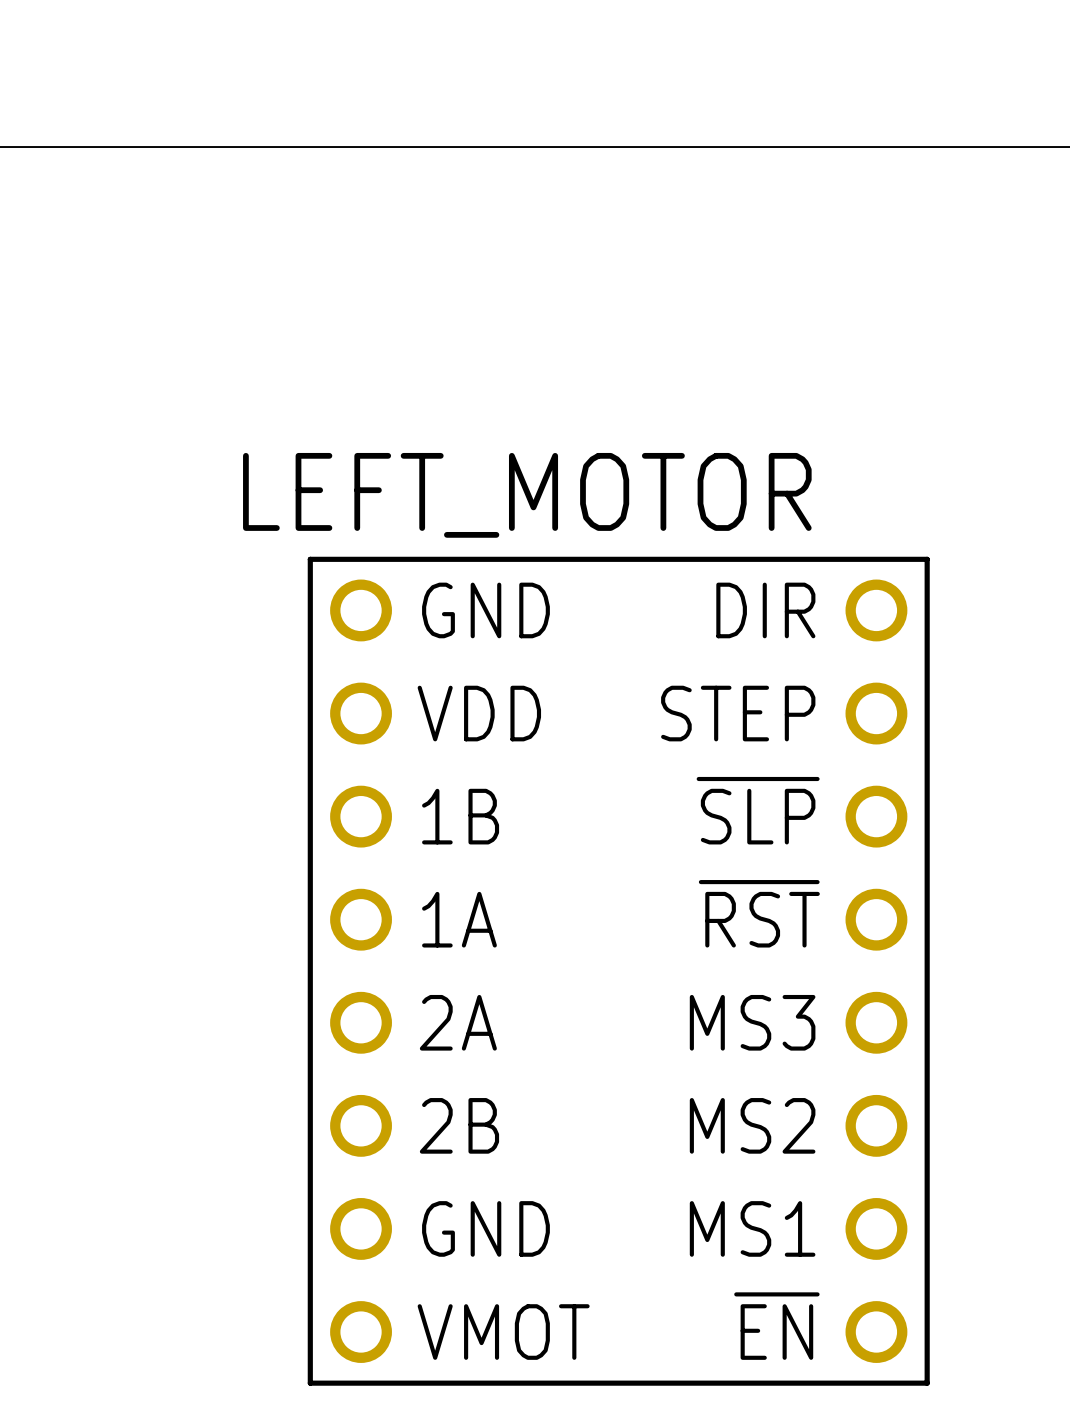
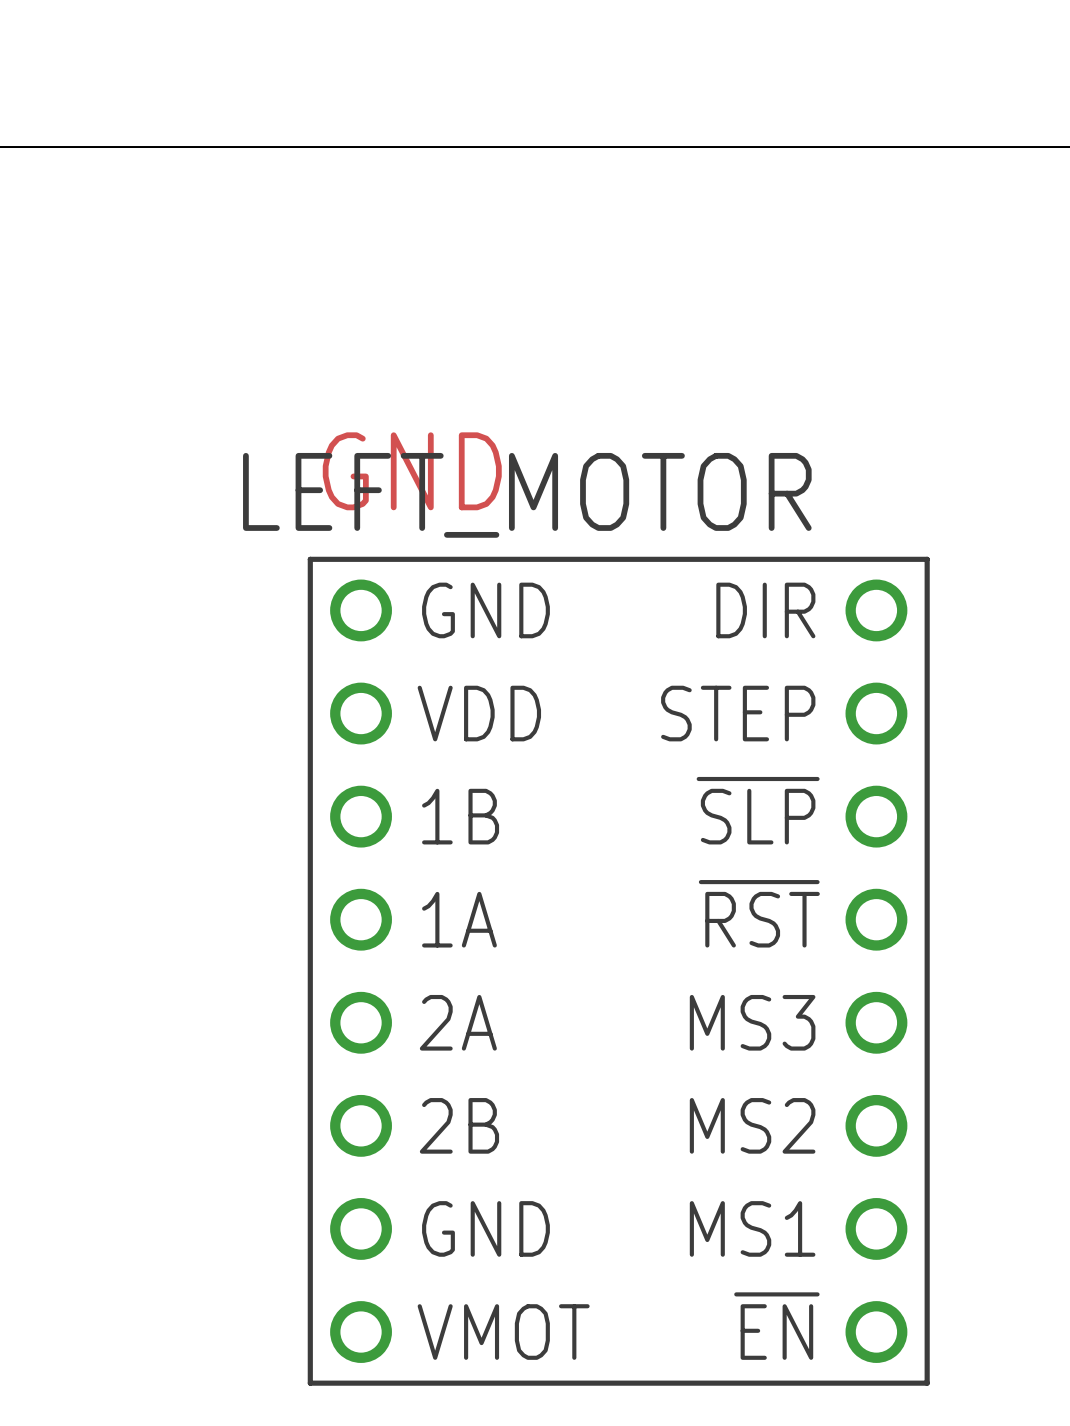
text: none -> GND (412, 471)

